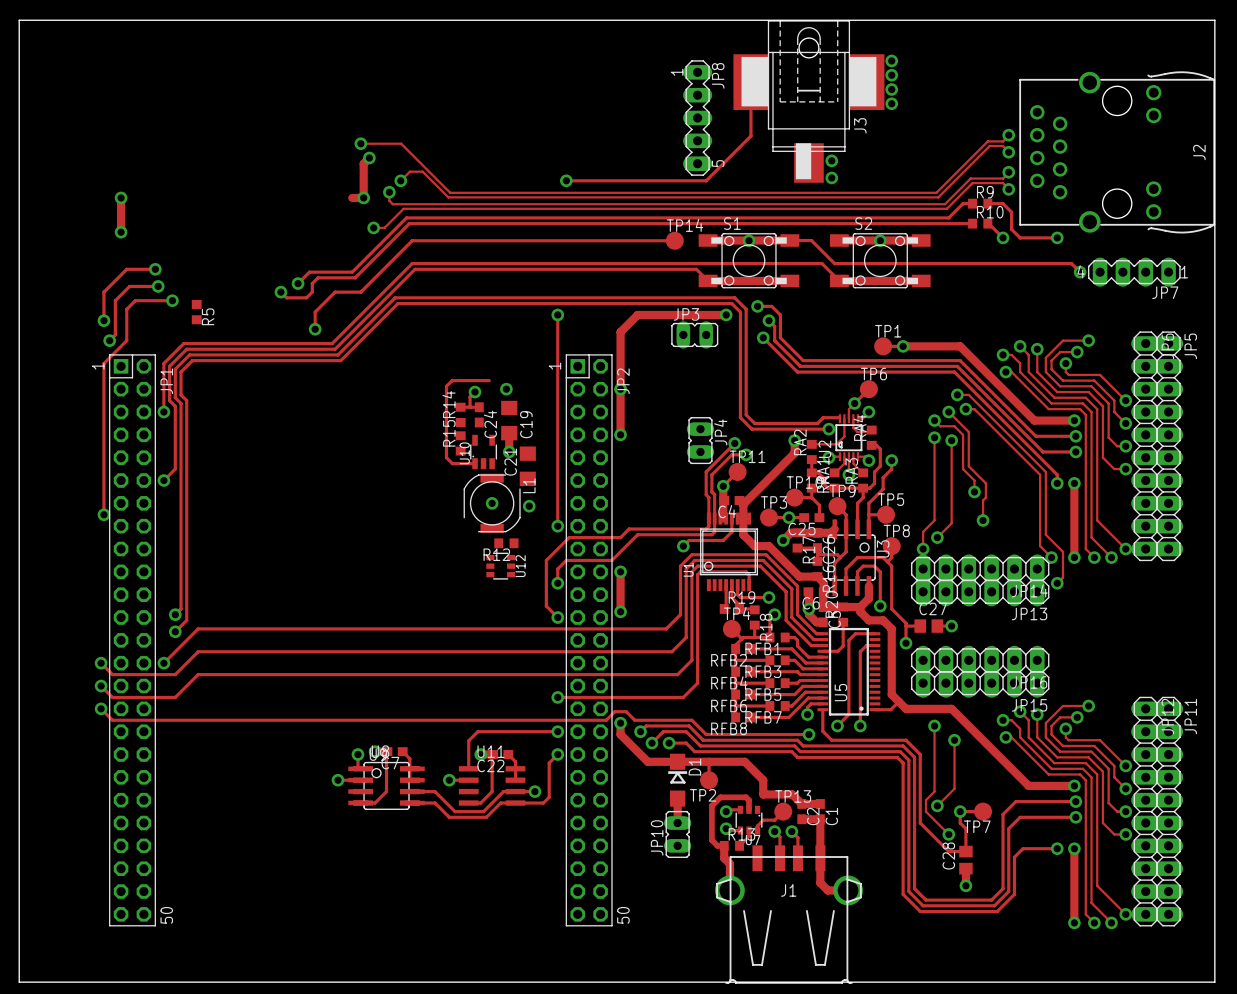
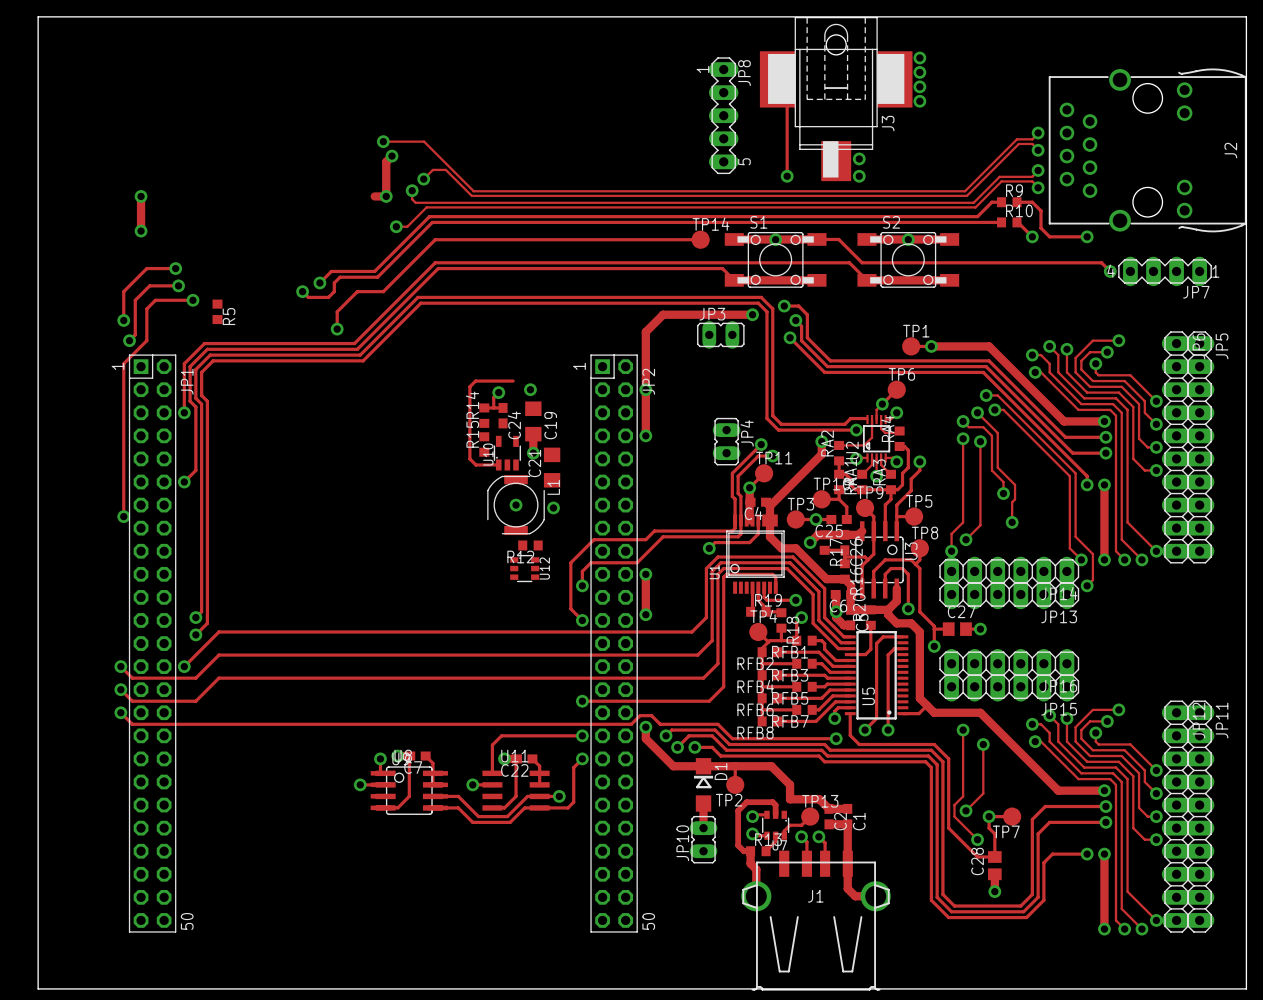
track: (750, 82) (750, 136) (706, 180) (566, 180) -> (777, 79) (787, 88) (787, 176)
via: none -> (787, 176)
via: (566, 180) -> none
track: (557, 314) (557, 526) -> none
via: (557, 314) -> none
via: (557, 526) -> none

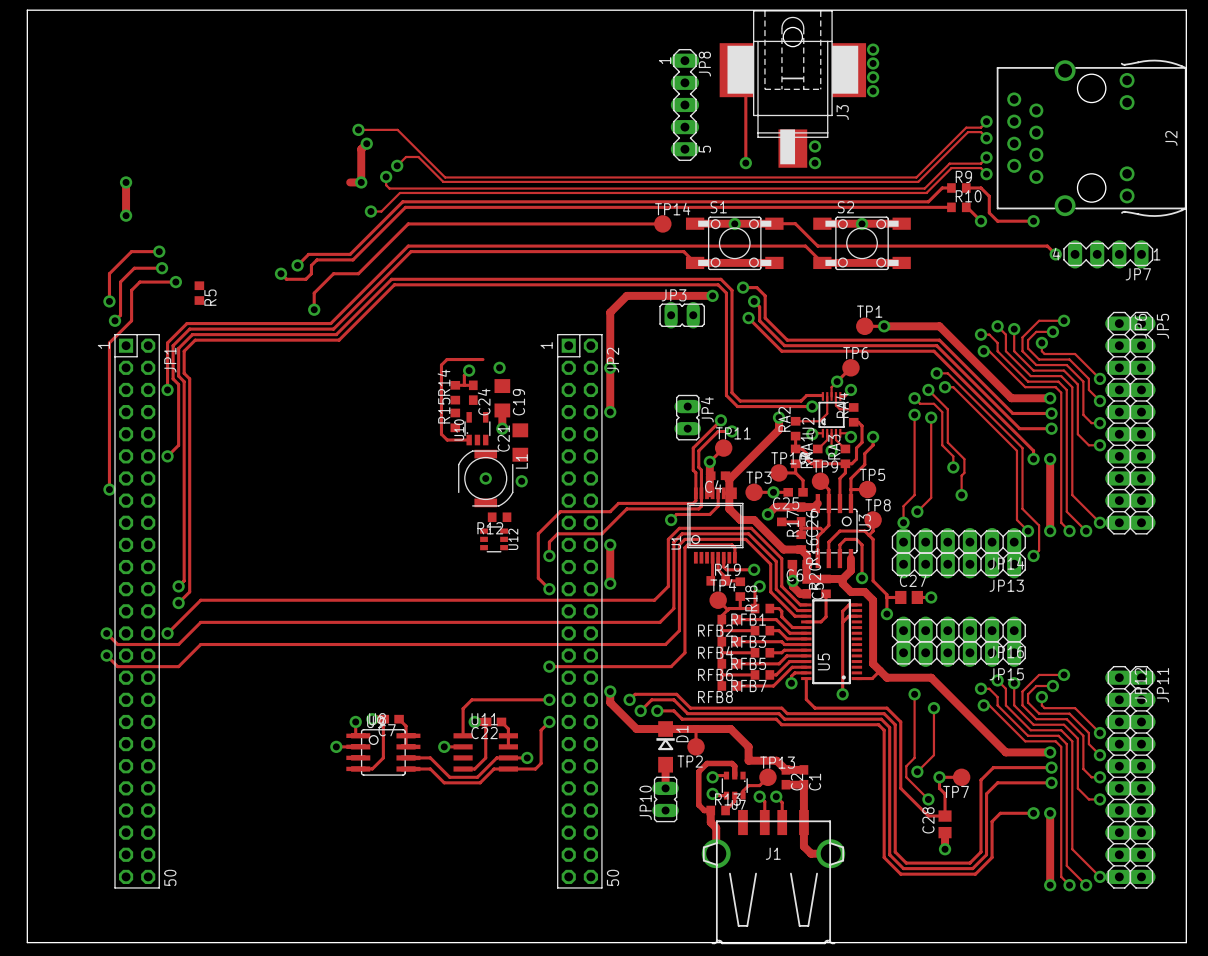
track: (894, 636) (883, 636) (876, 643) (876, 718) (865, 730) -> (849, 604) (842, 611) (842, 622)
track: (120, 712) (132, 724) (631, 724) (640, 715) (651, 715) (660, 724) (717, 724) (732, 738) (836, 738) -> none
via: (120, 712) -> none
via: (865, 730) -> none
via: (836, 738) -> none

